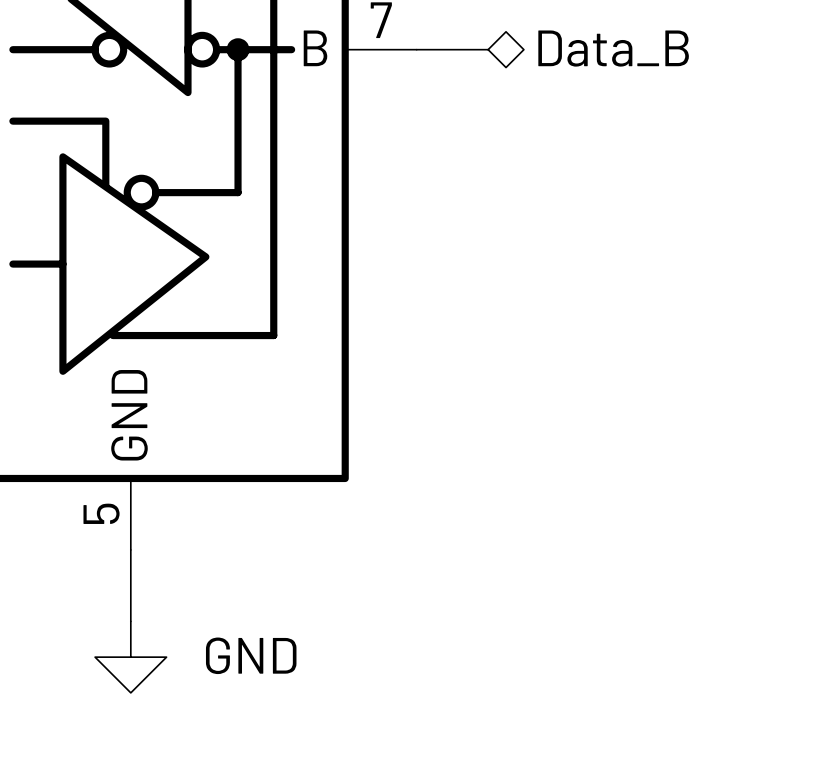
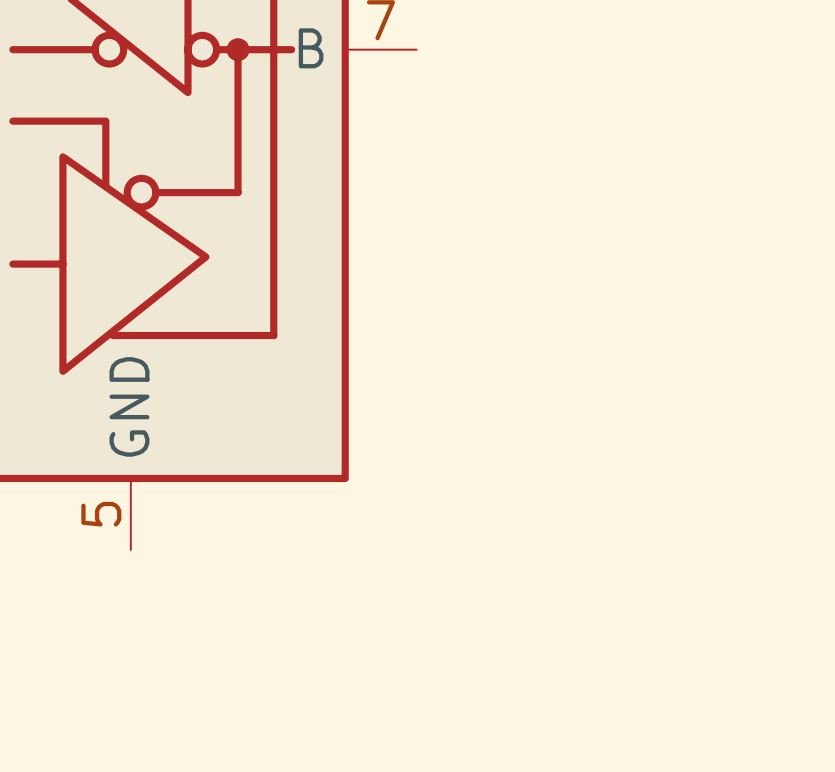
hierarchical label: Data_B (613, 48) -> none
wire: (416, 49) (488, 49) -> none
wire: (130, 549) (130, 621) -> none
power symbol: GND (130, 657) -> none

